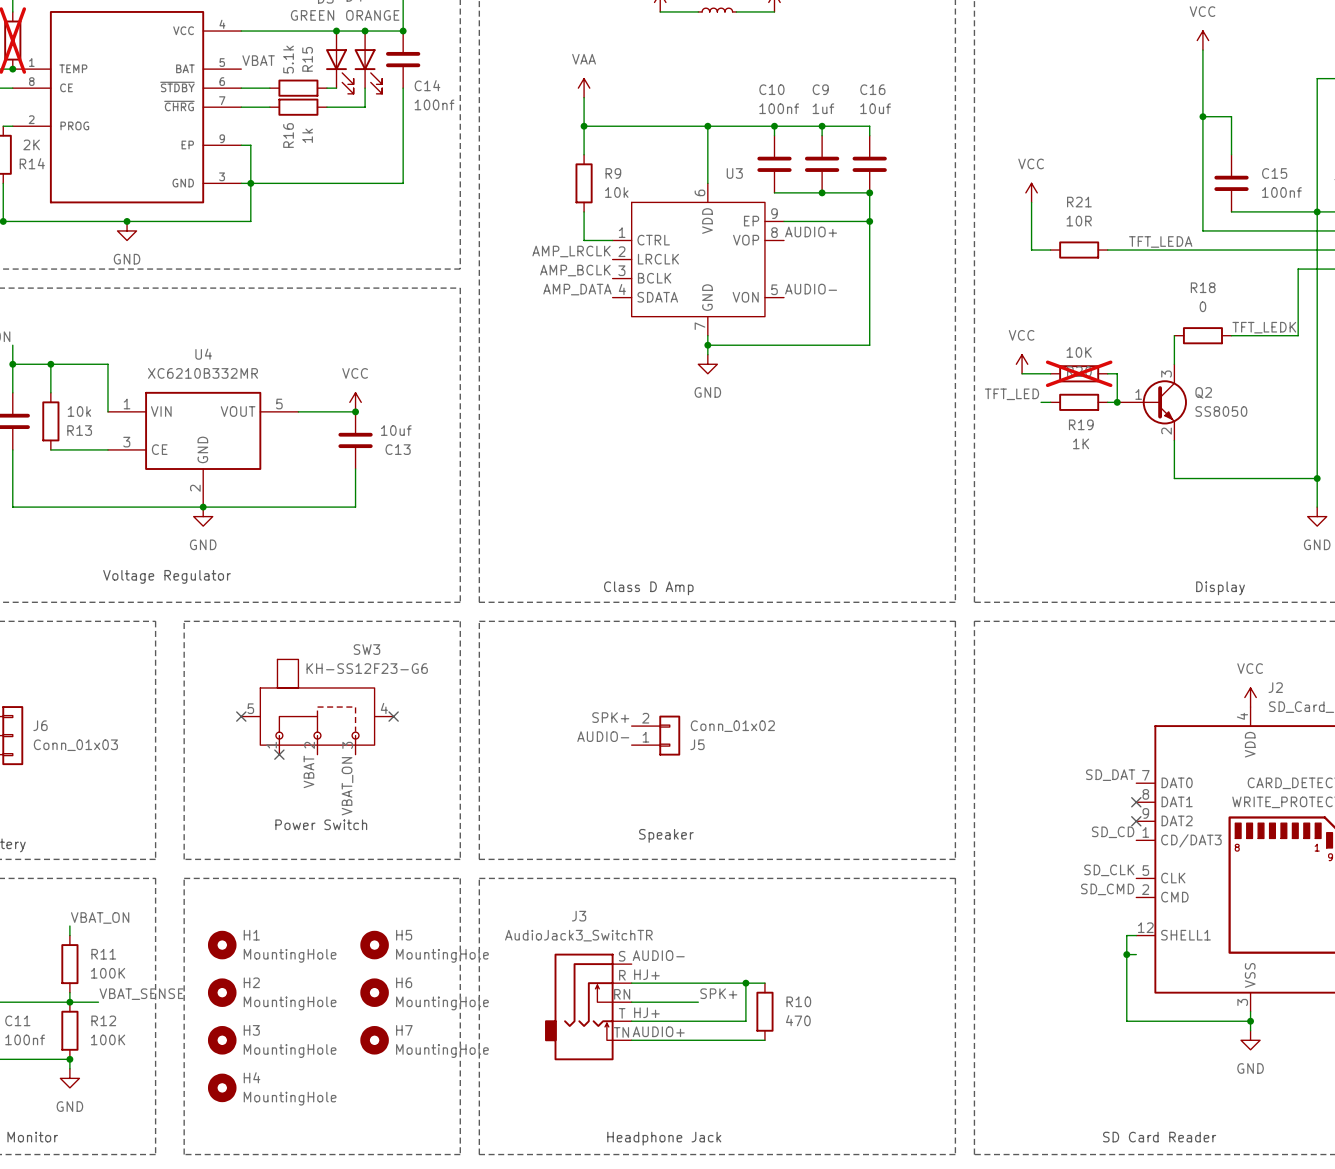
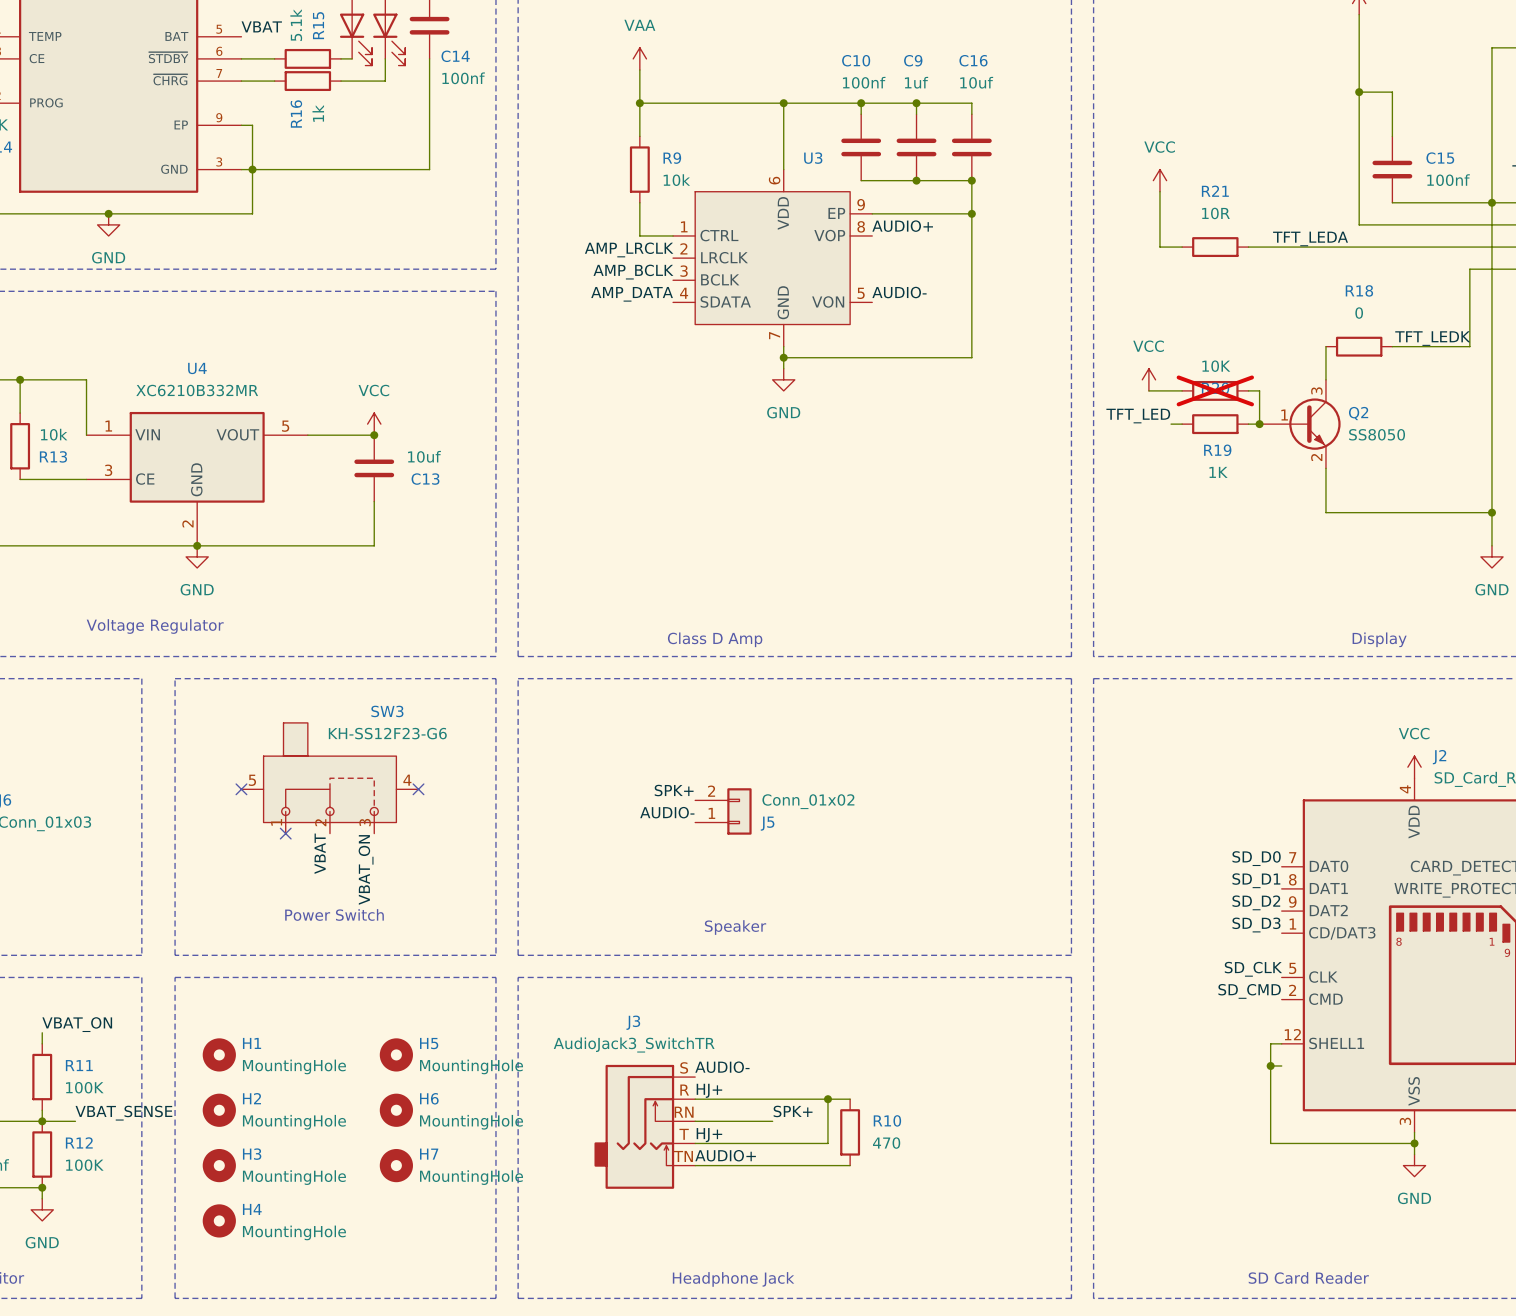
label: SD_DAT (1110, 775) -> SD_D0 (1256, 858)
label: none -> SD_D1 (1256, 880)
no-connect mark: (1136, 802) -> none
label: none -> SD_D2 (1256, 902)
no-connect mark: (1136, 821) -> none
label: SD_CD (1113, 832) -> SD_D3 (1256, 925)

